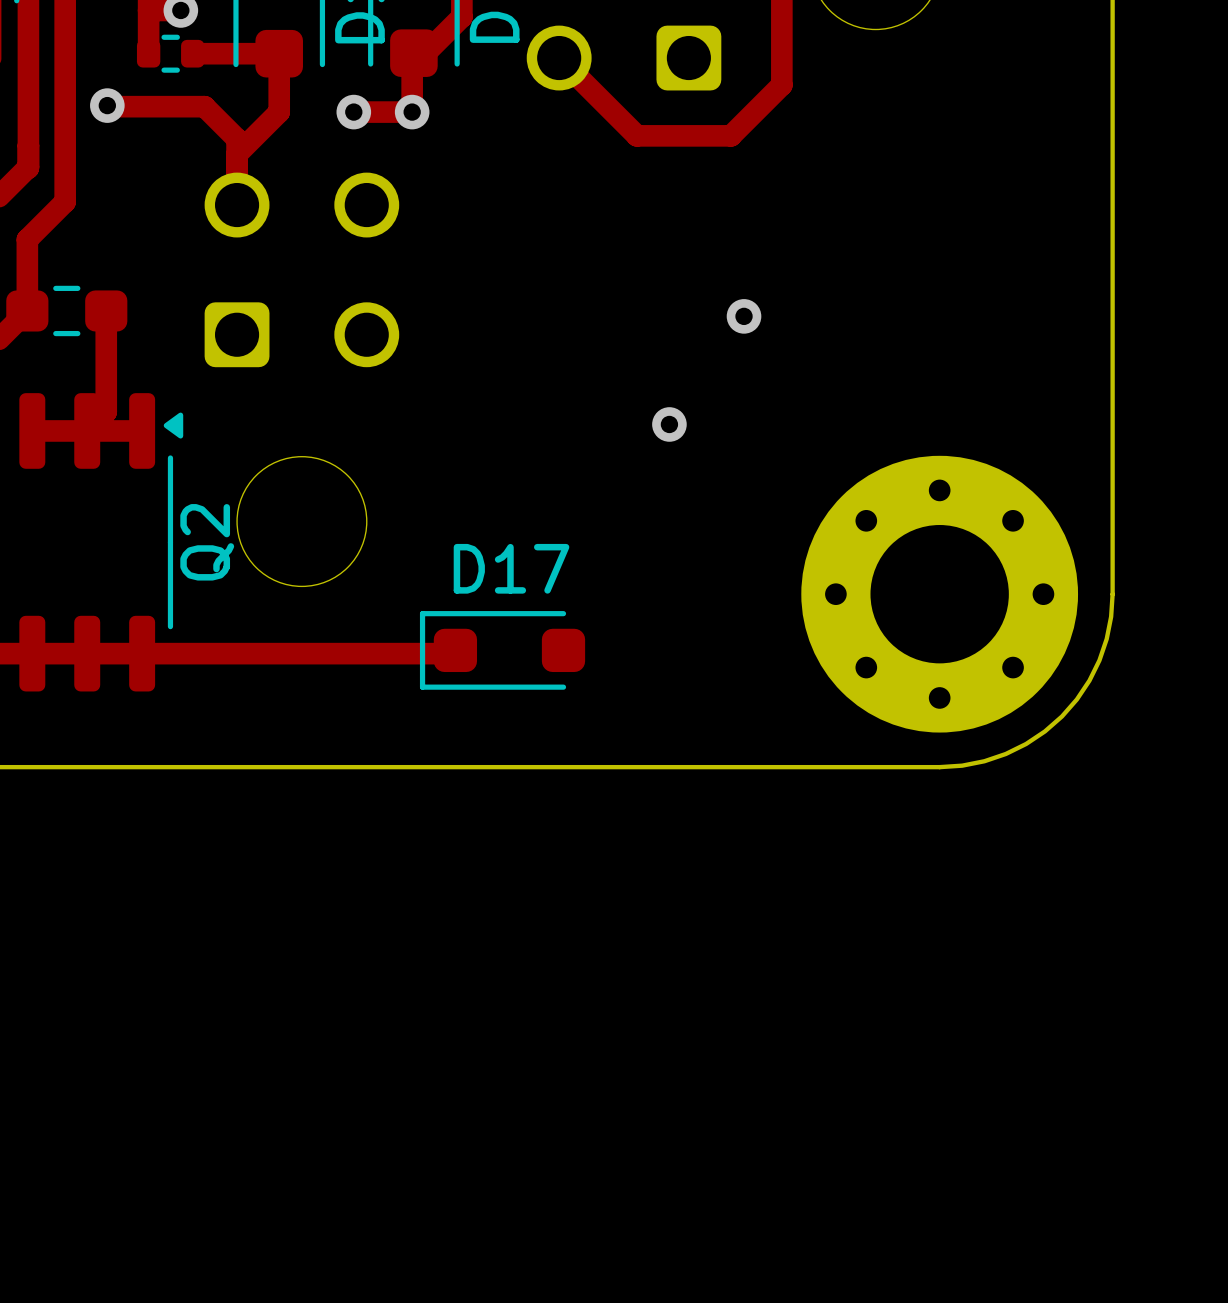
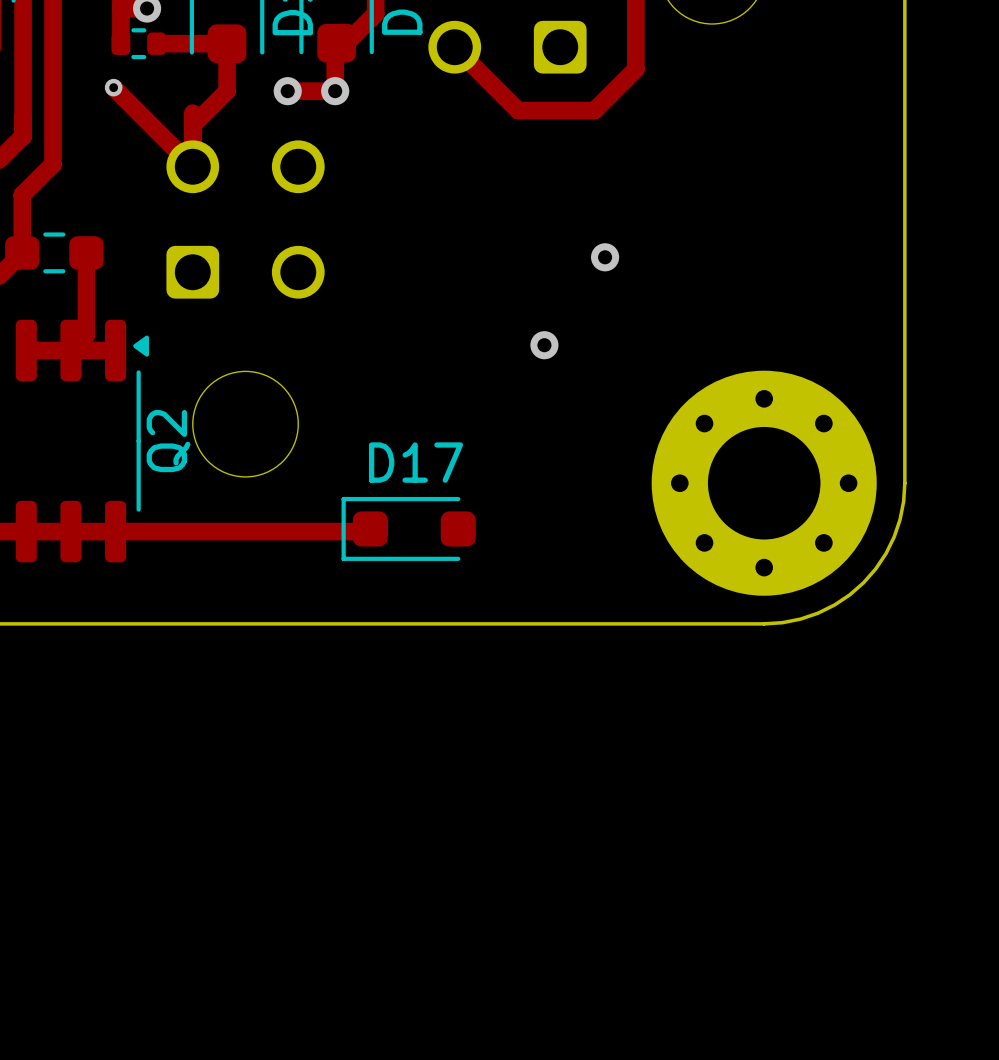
track: (107, 105) (204, 106) (237, 139) -> none
via: (107, 105) -> none
via: none -> (113, 87)
track: none -> (114, 88) (192, 166)

